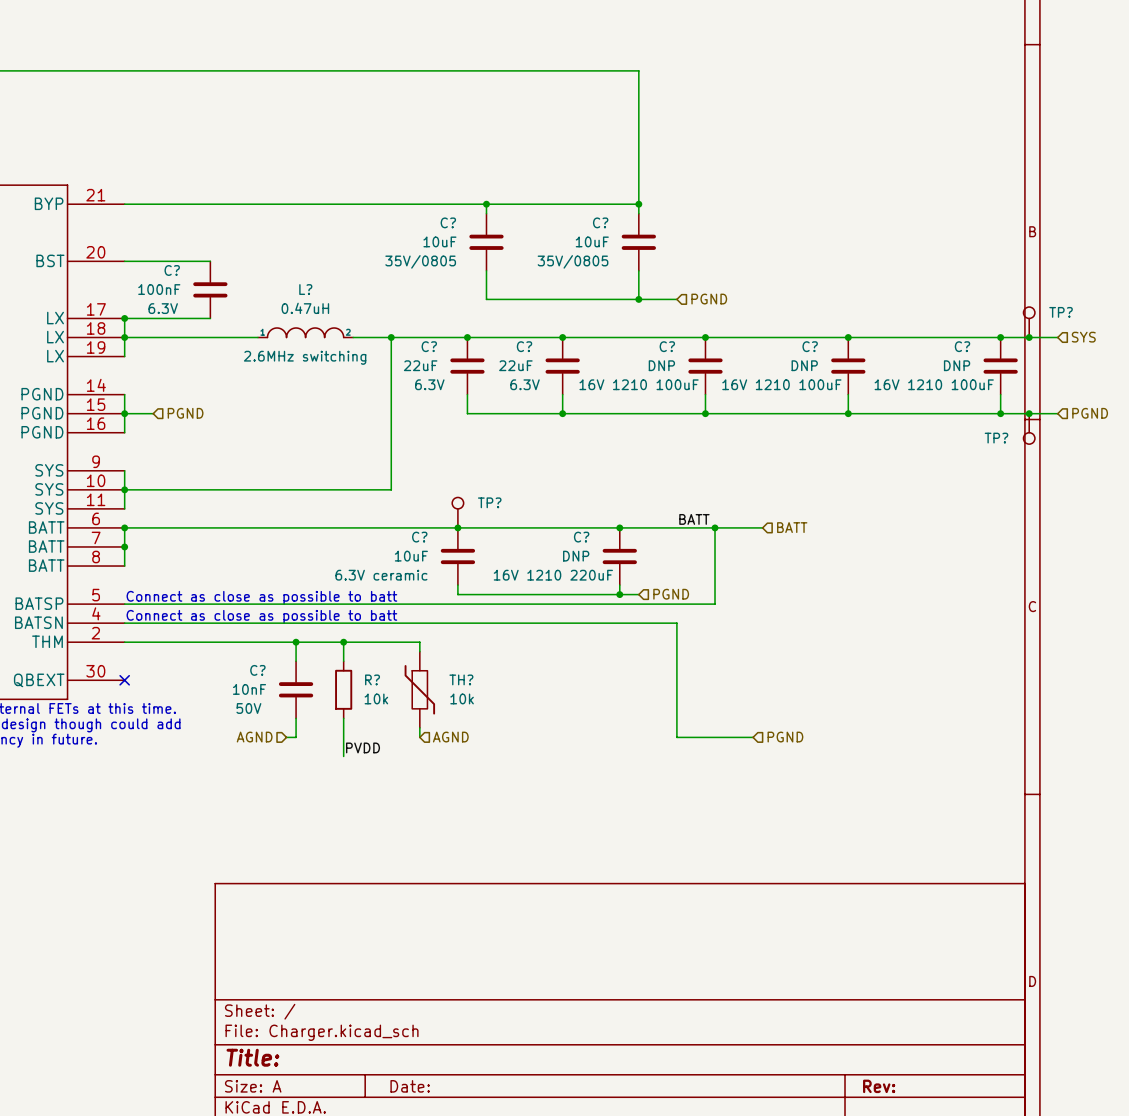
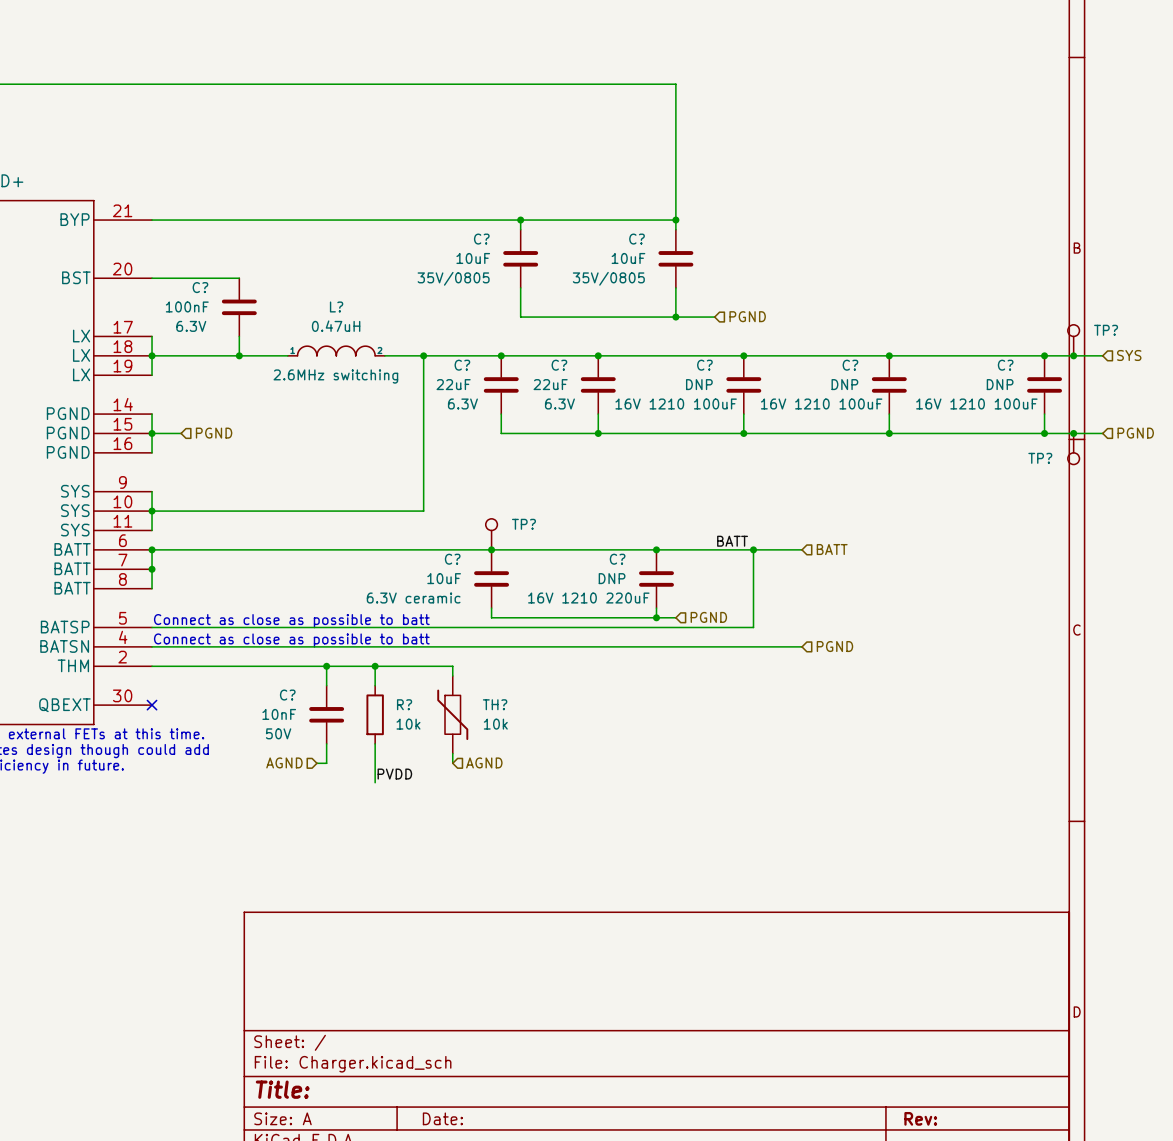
wire: (124, 318) (210, 318) -> (239, 355) (239, 336)
junction: (124, 318) -> none
junction: none -> (239, 355)
wire: (676, 623) (676, 737) (753, 737) -> (714, 646) (802, 646)
hierarchical label position: PGND (785, 737) -> PGND (834, 646)

